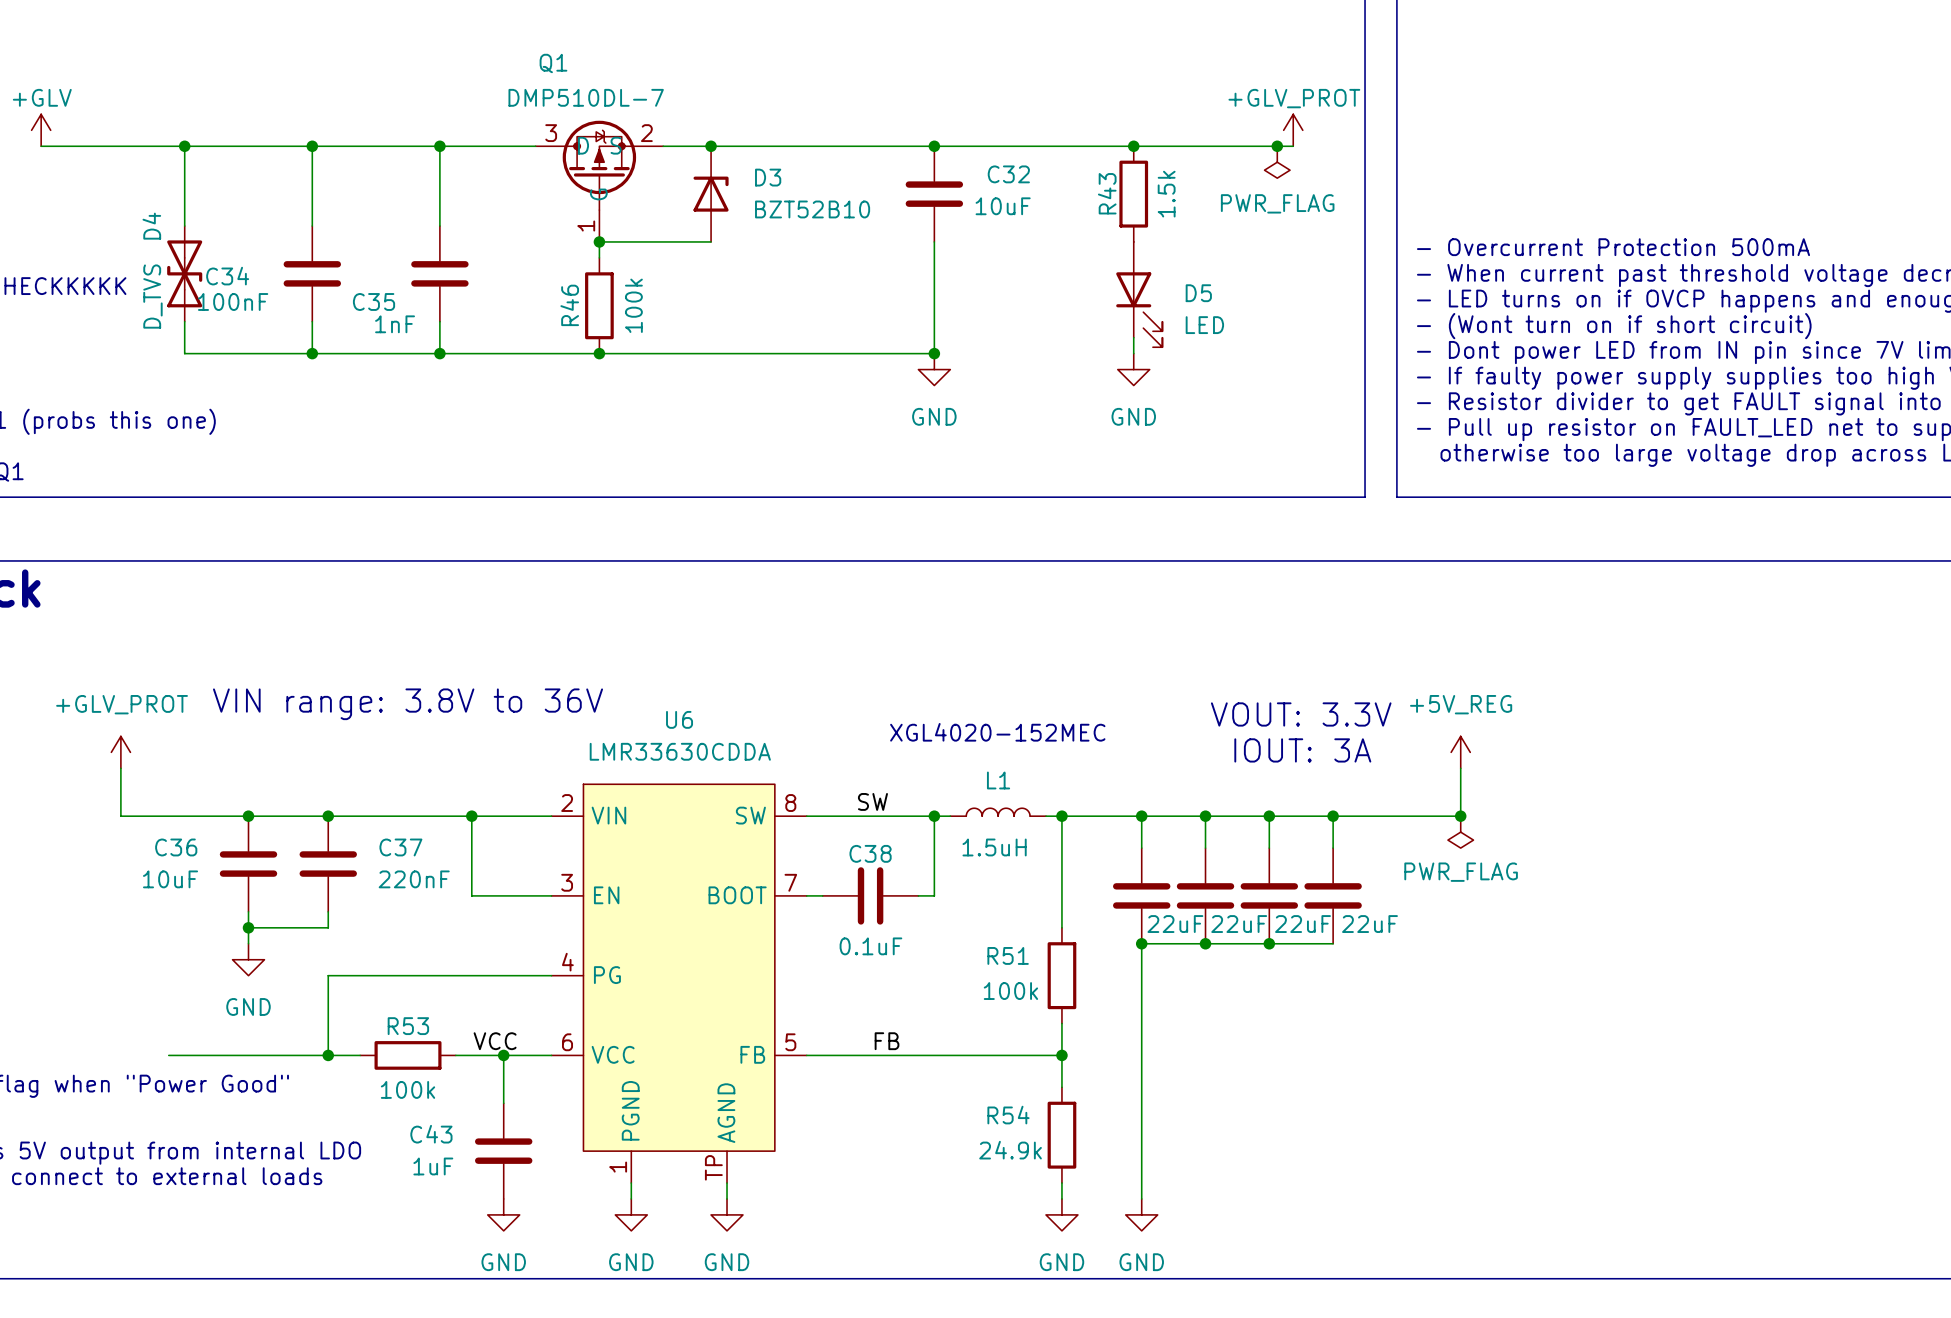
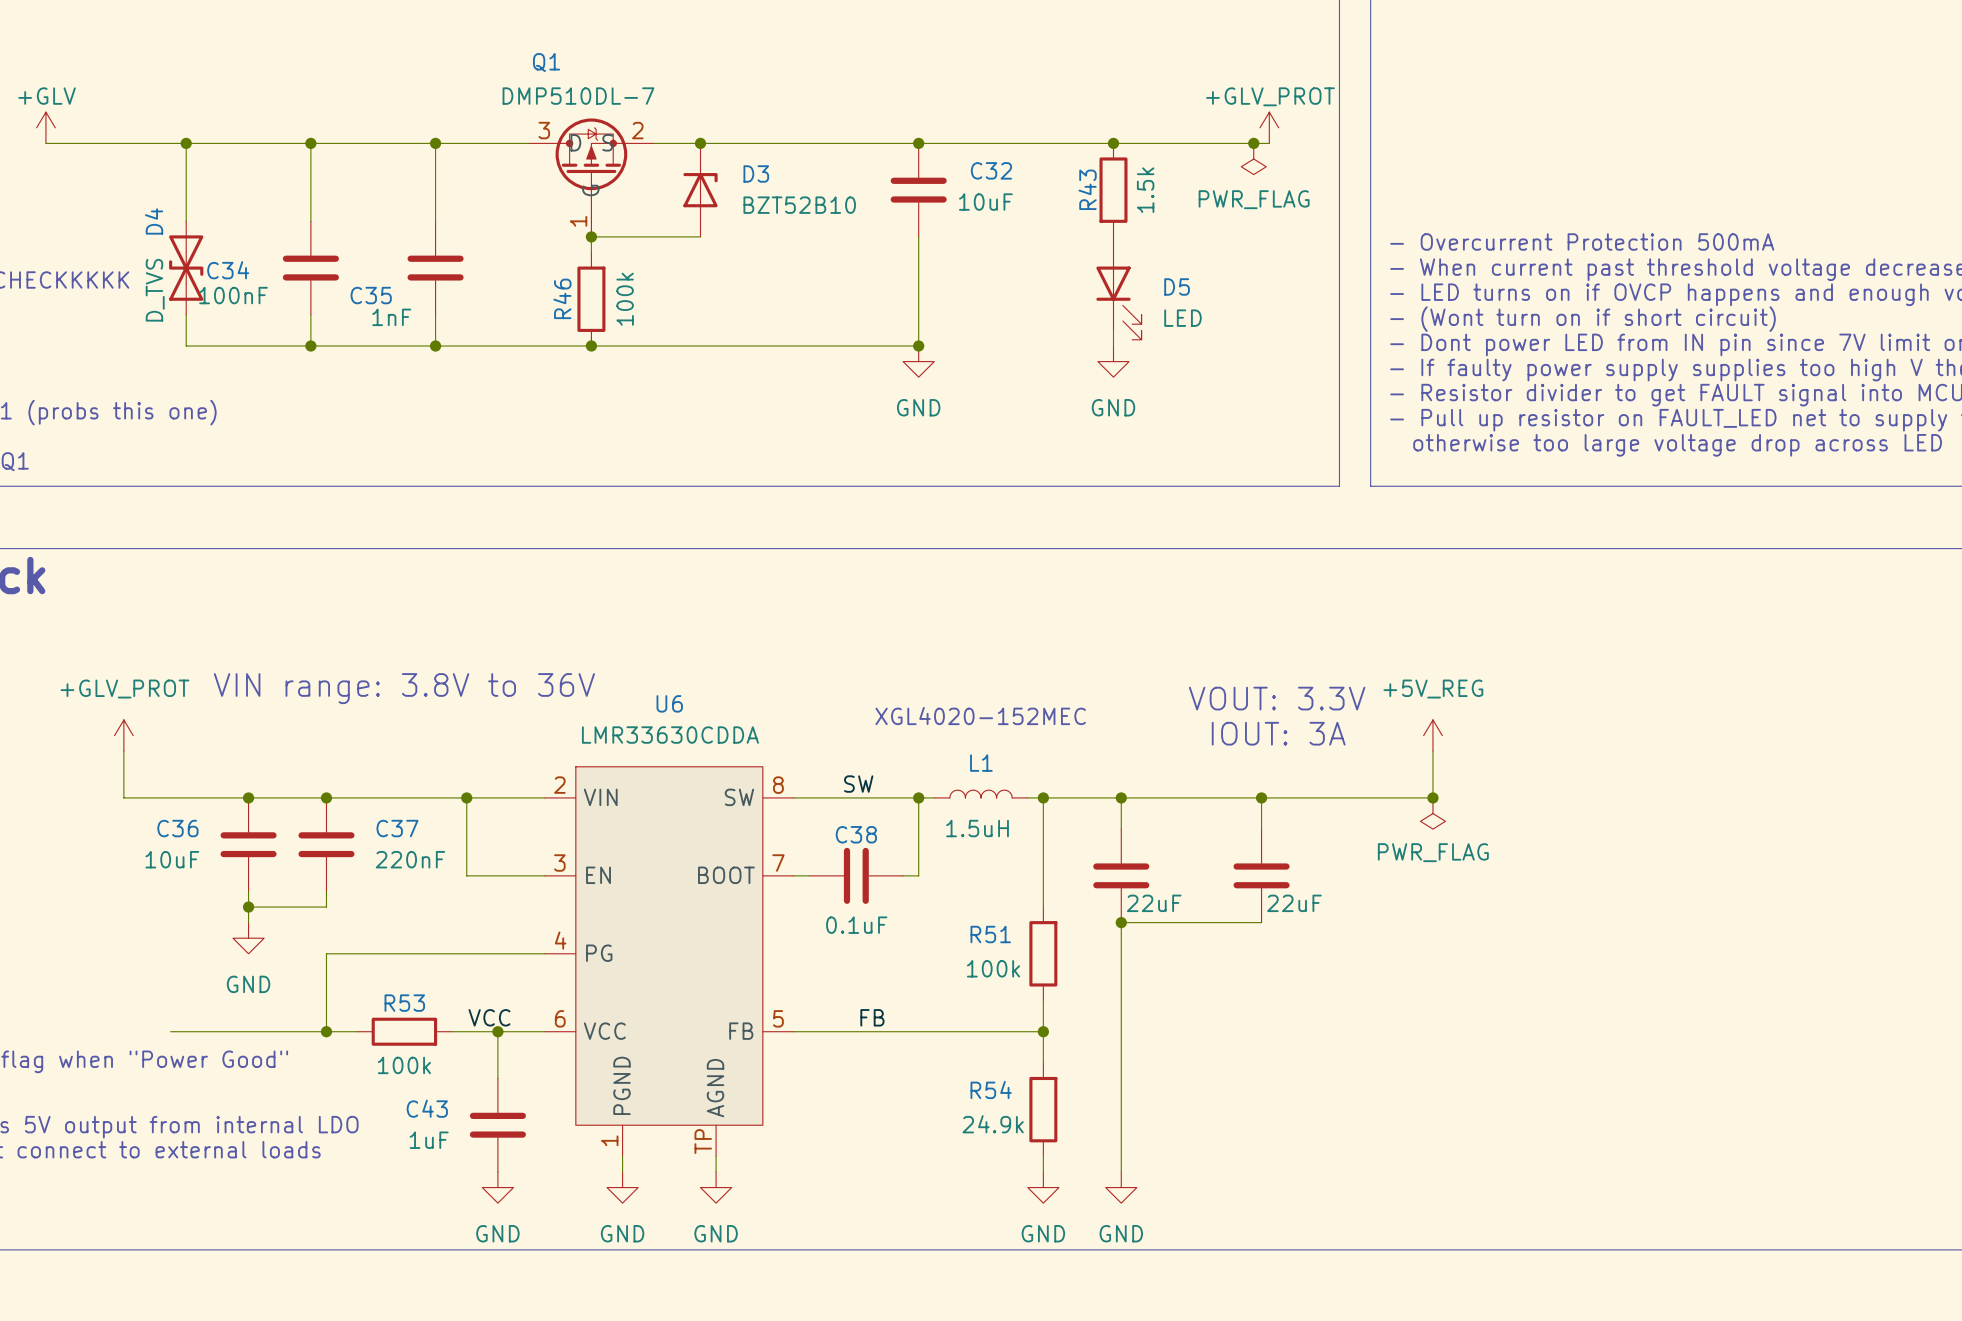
wire: (1205, 816) (1205, 848) -> none
junction: (1205, 816) -> none
wire: (1269, 816) (1269, 848) -> (1261, 797) (1261, 829)
junction position: (1269, 816) -> (1261, 797)
wire: (1333, 816) (1333, 848) -> none
junction: (1333, 816) -> none
part: 22uF (1205, 895) -> none
part position: (1269, 895) -> (1261, 875)
part: 22uF (1333, 895) -> none
junction: (1205, 943) -> none
junction: (1269, 943) -> none
wire: (1285, 943) (1333, 943) -> none

